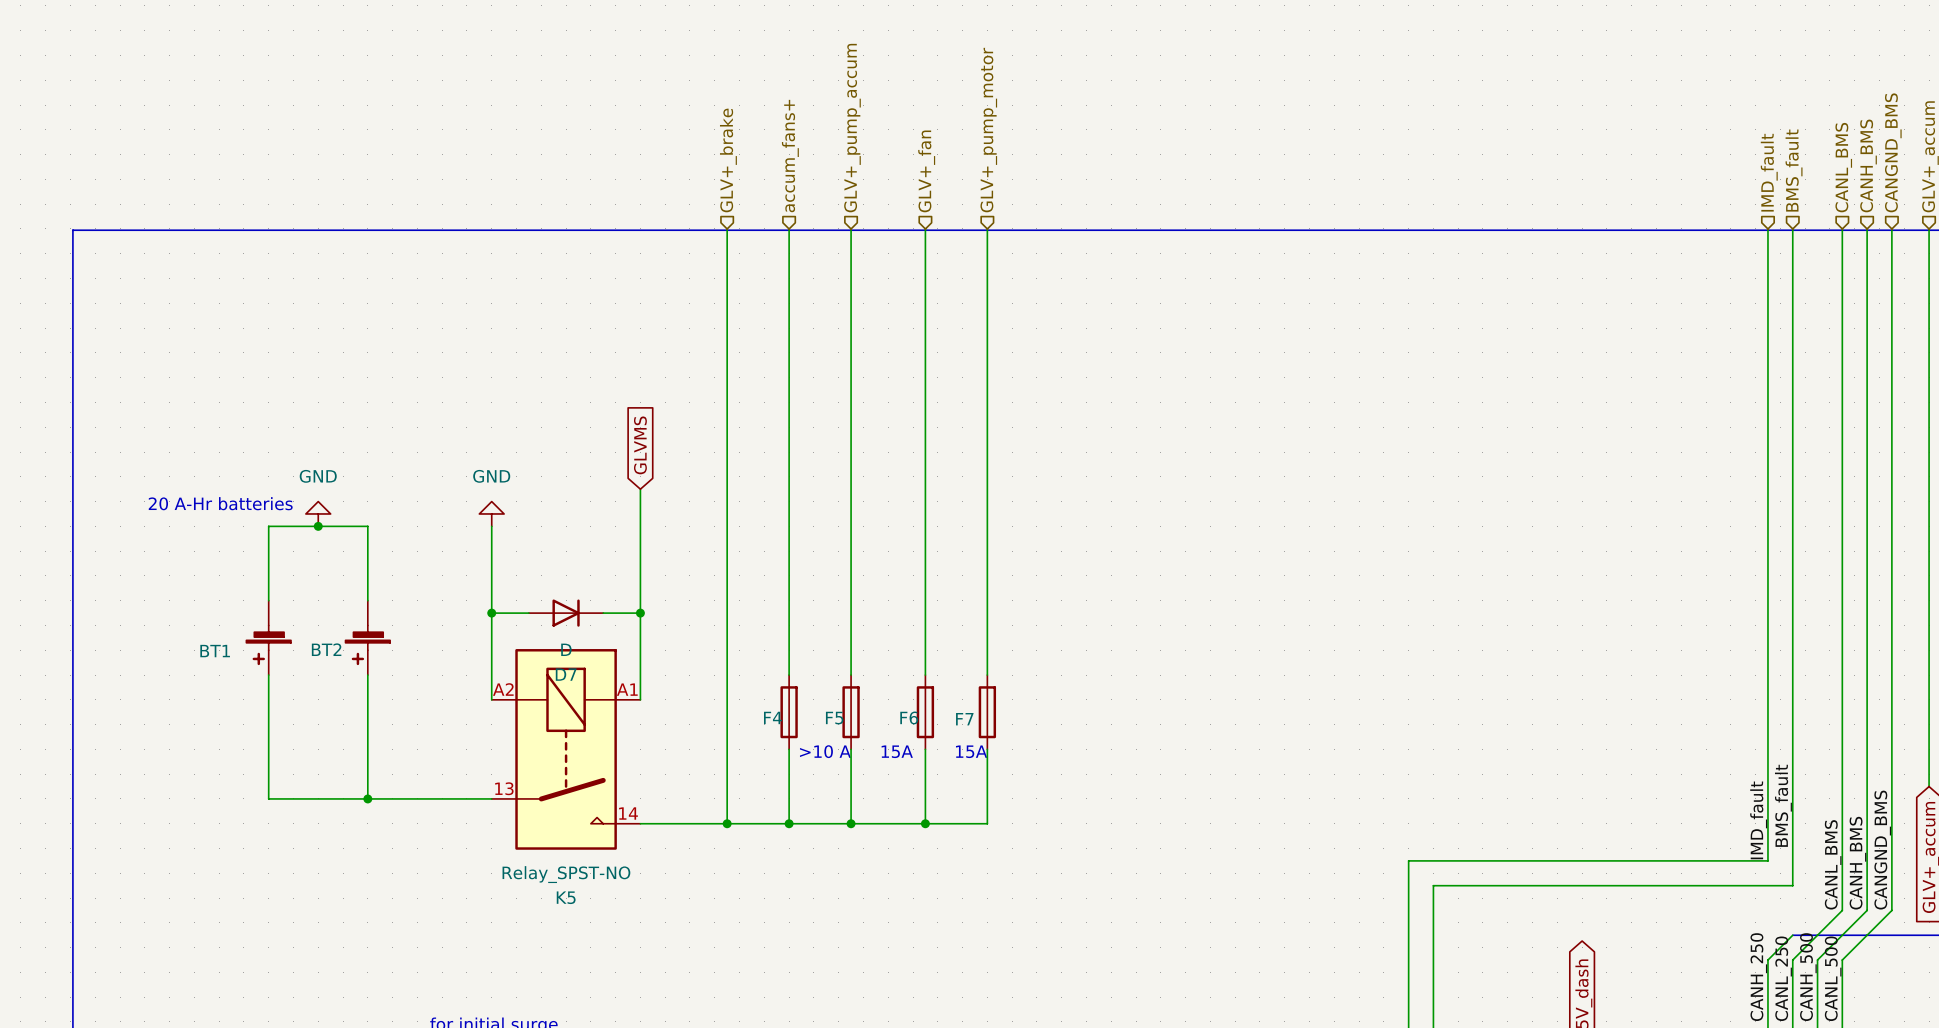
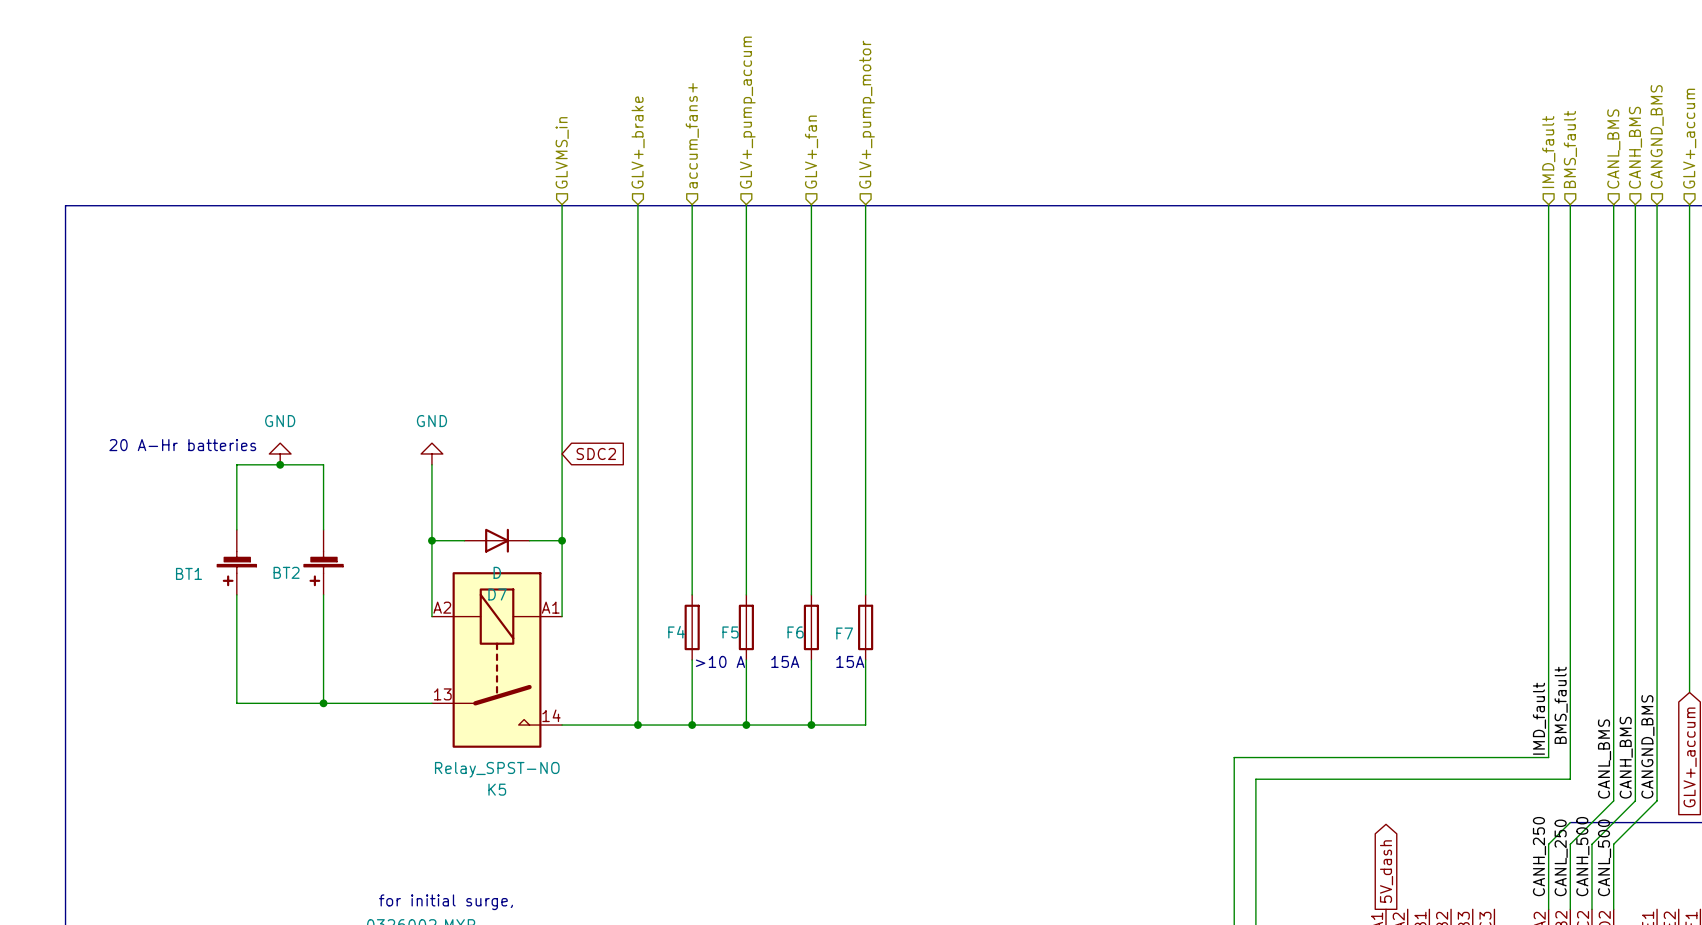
hierarchical label: none -> GLVMS_in (562, 152)
wire: none -> (562, 204) (562, 432)
global label: GLVMS (640, 445) -> none
global label: none -> SDC2 (596, 453)

